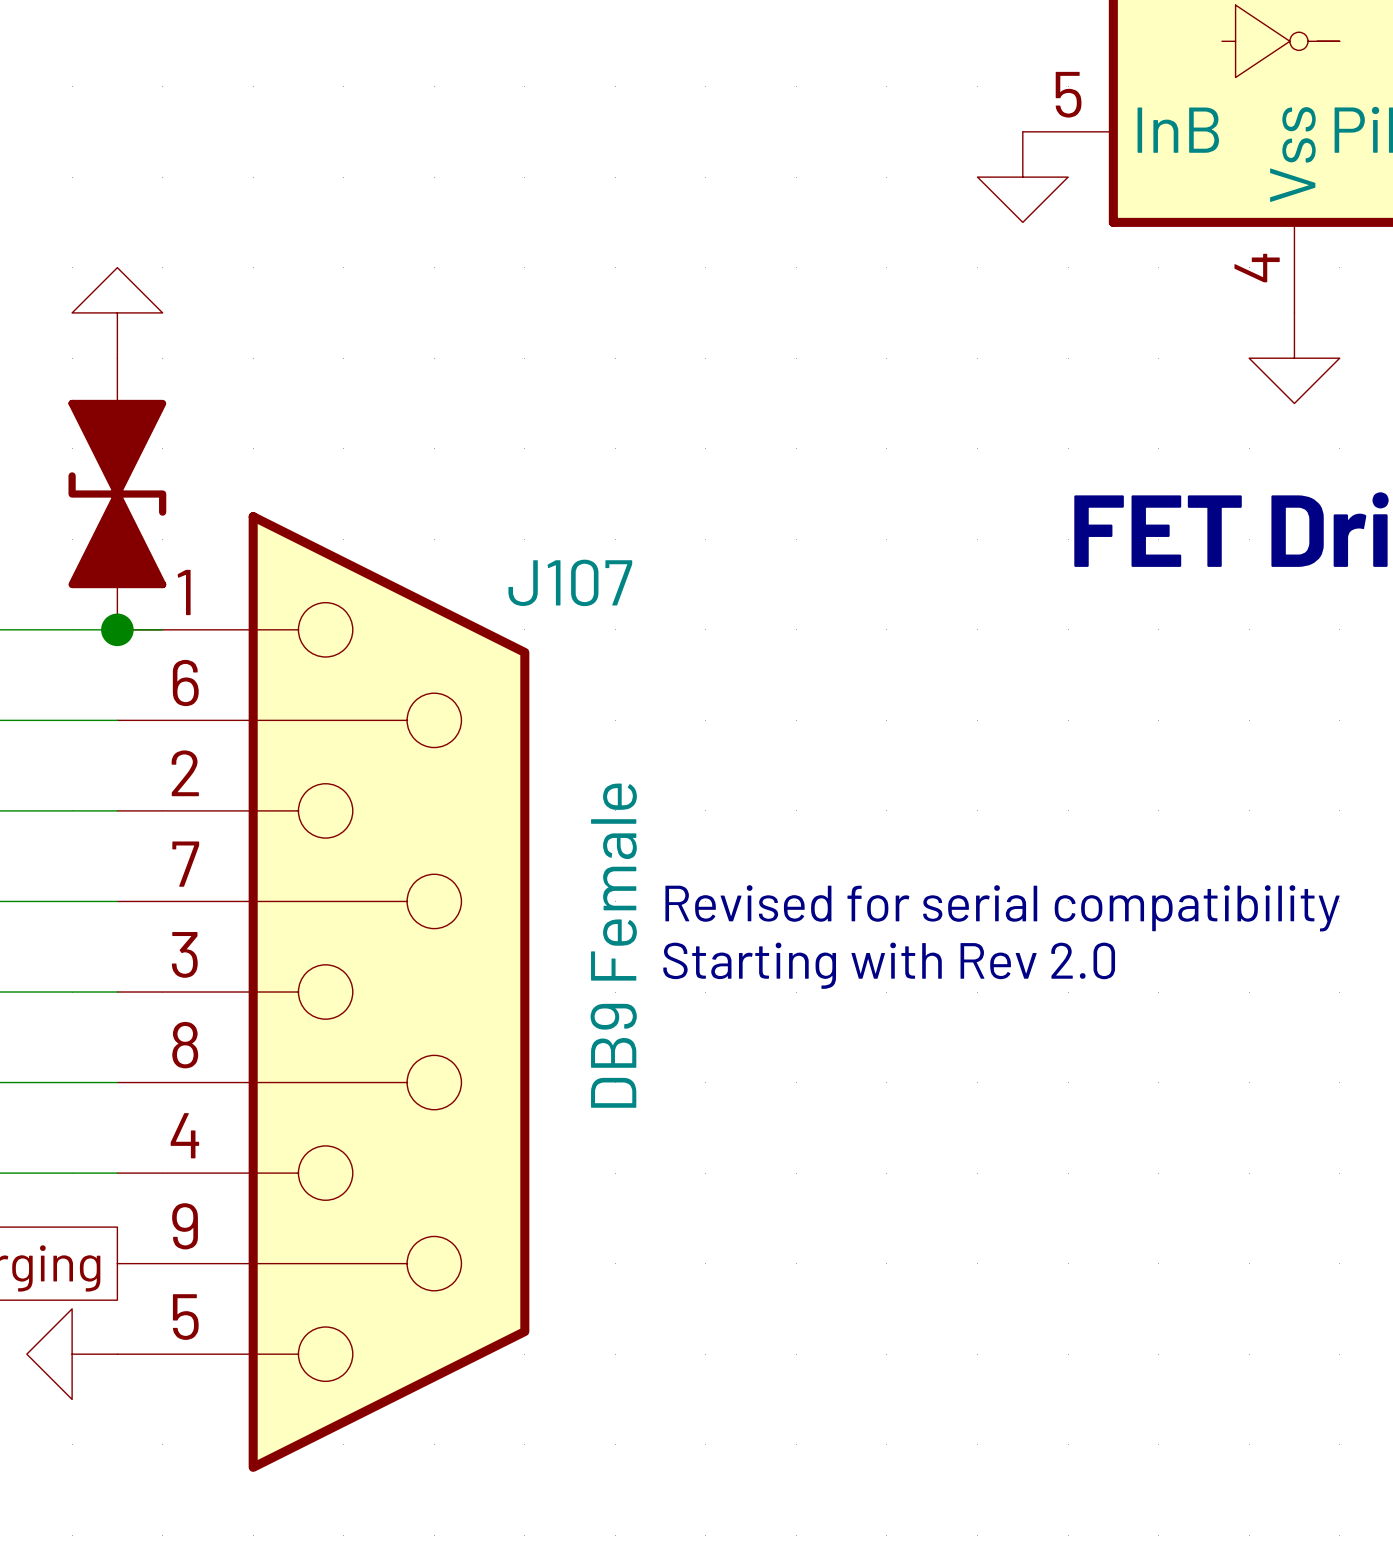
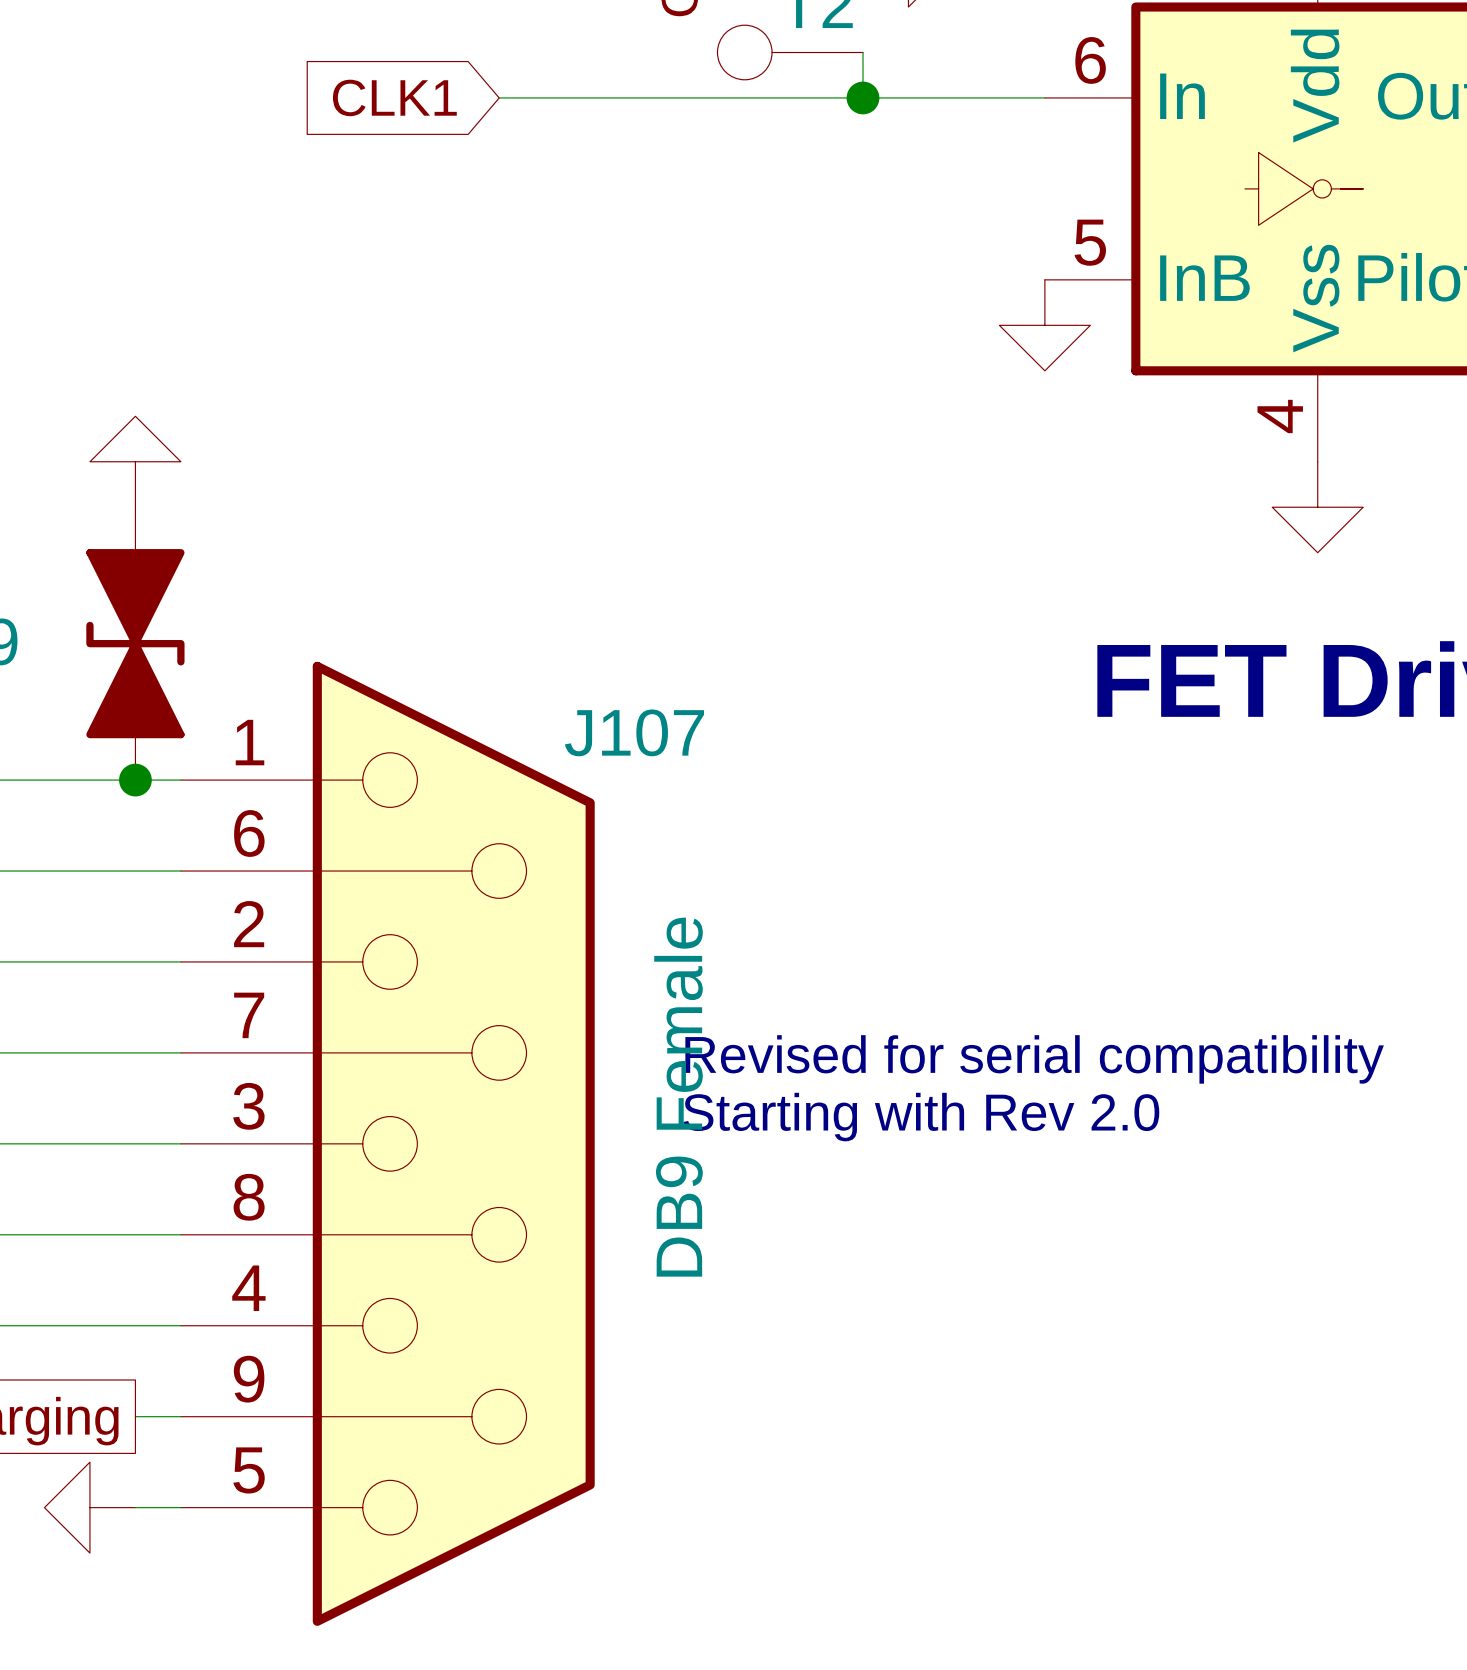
J107 position: (323, 992) -> (387, 1143)

